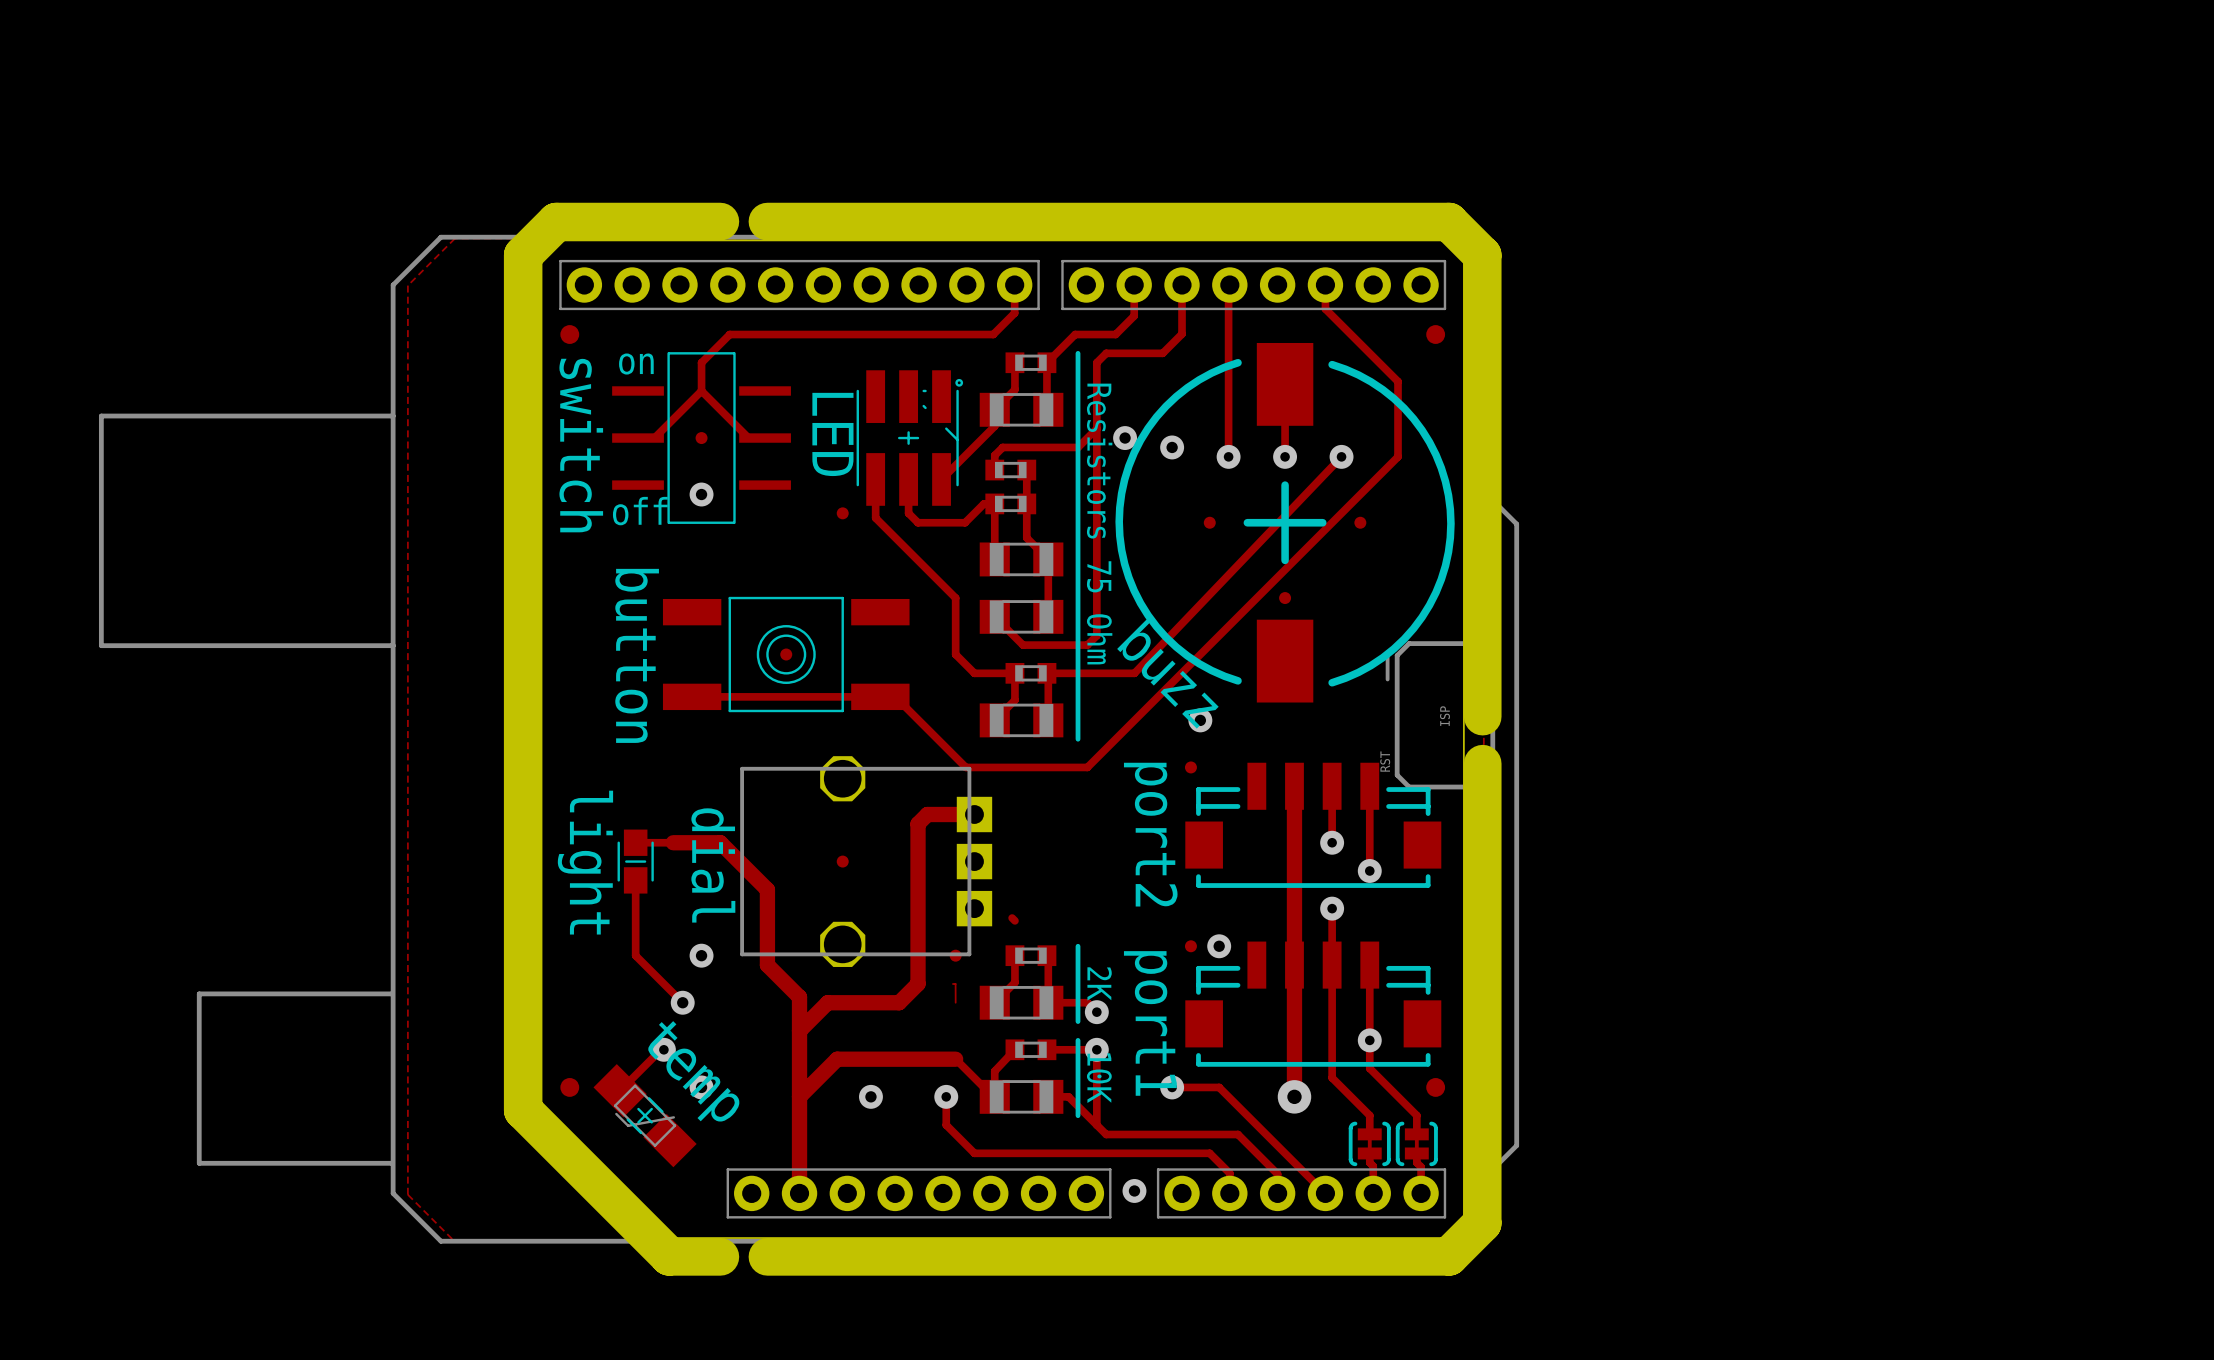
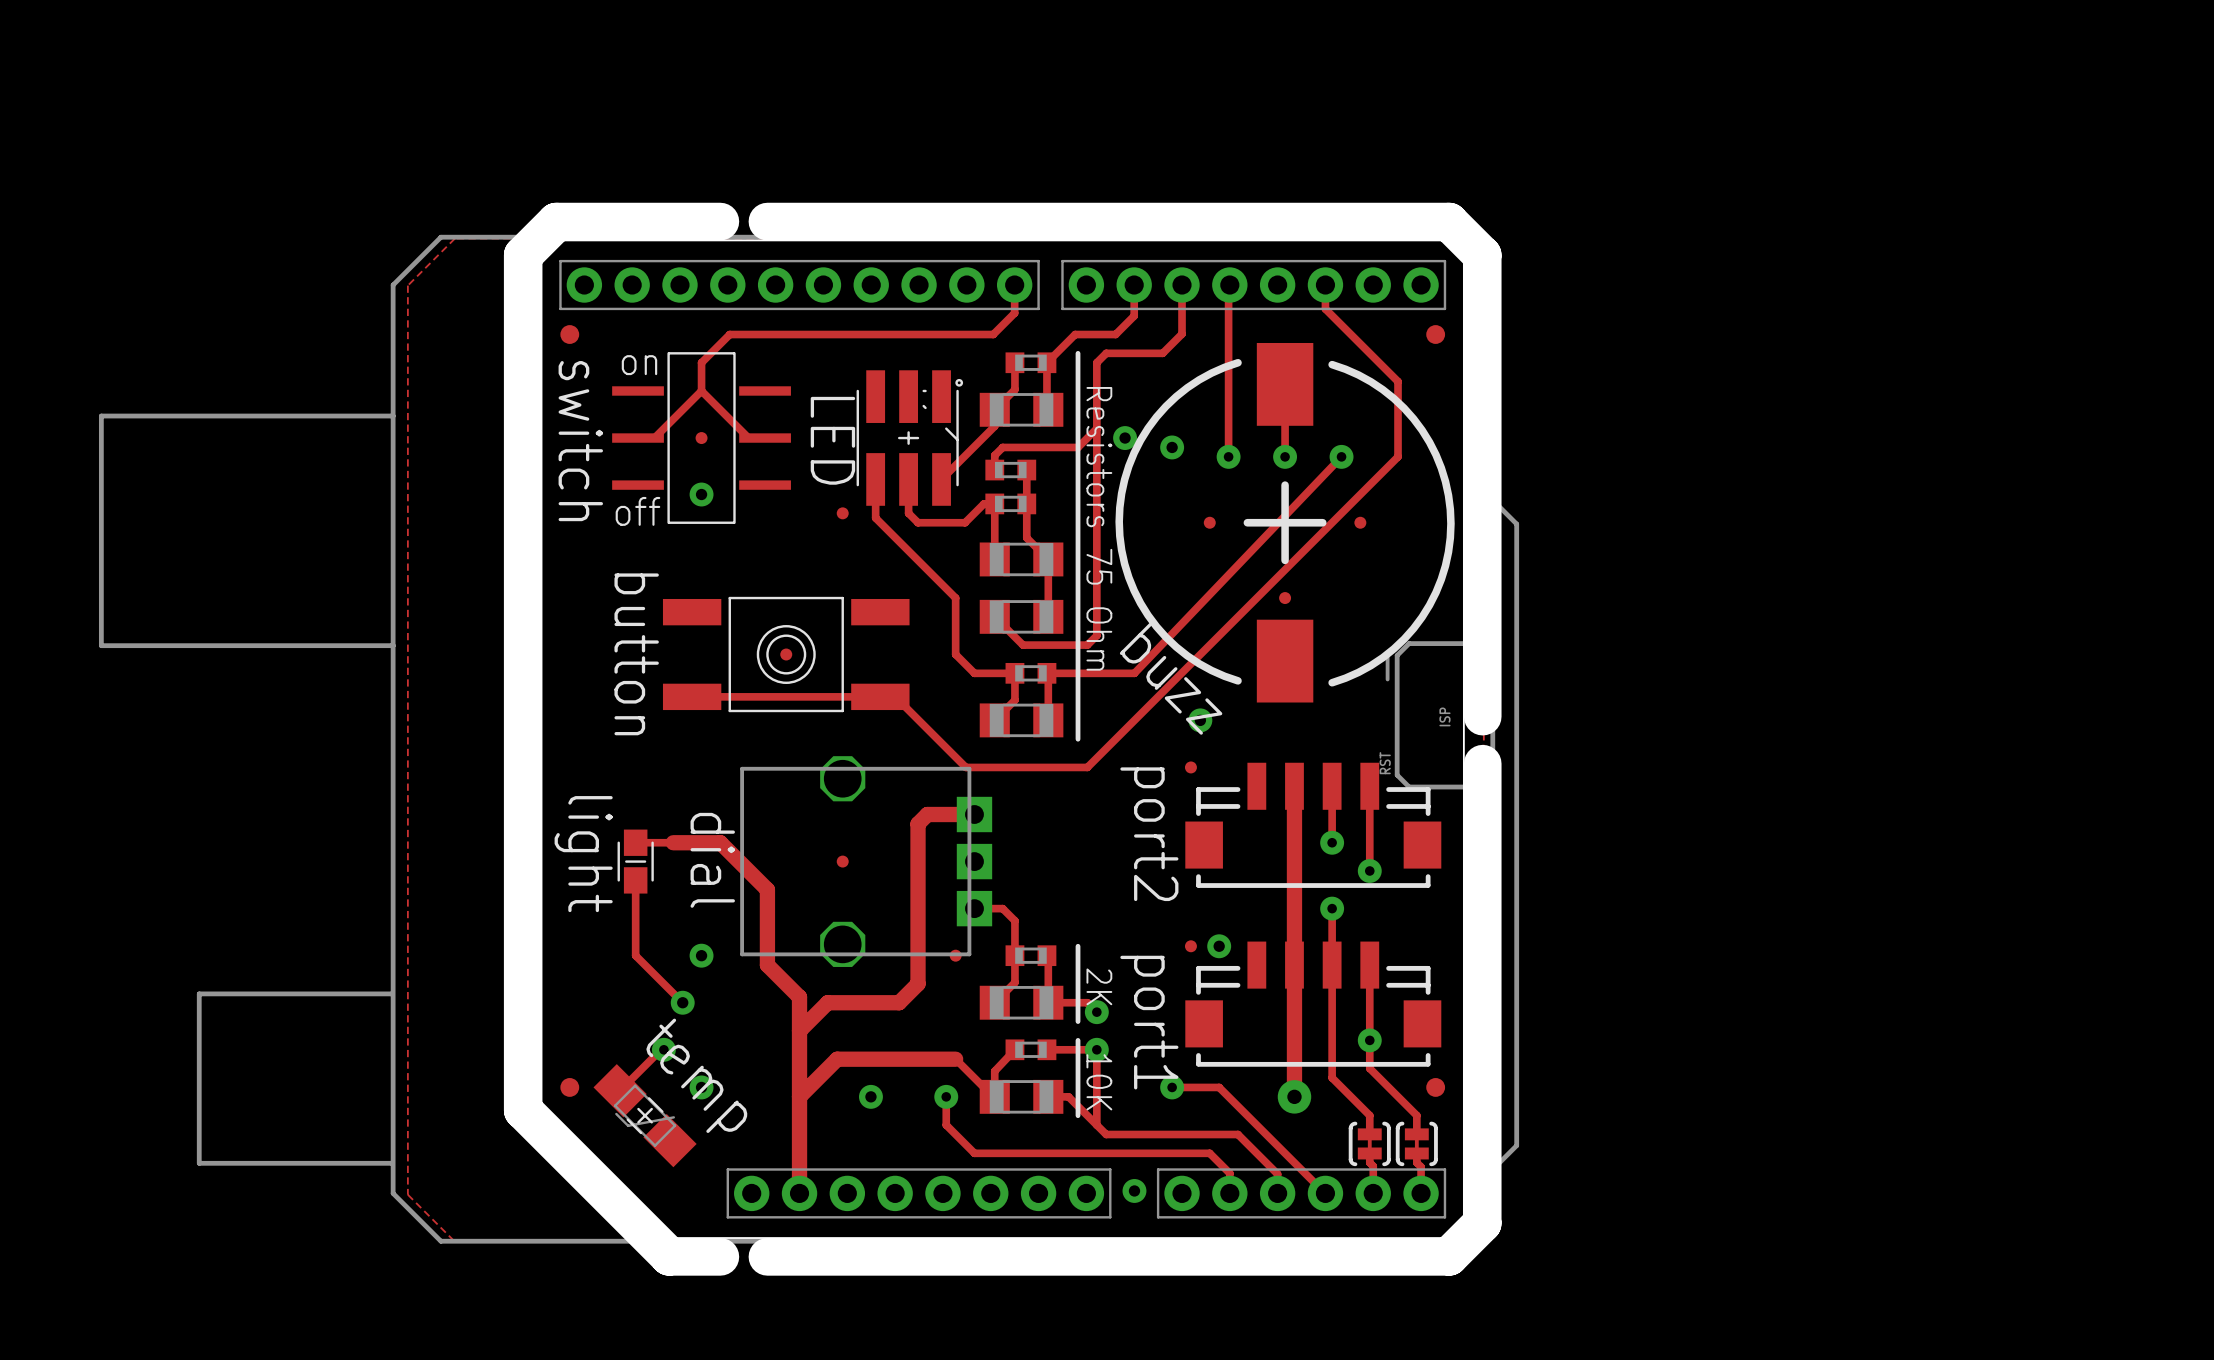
track: none -> (974, 908) (1002, 908) (1012, 918)
track: none -> (1014, 920) (1014, 955)
track: (952, 983) (955, 983) (955, 1002) -> none

